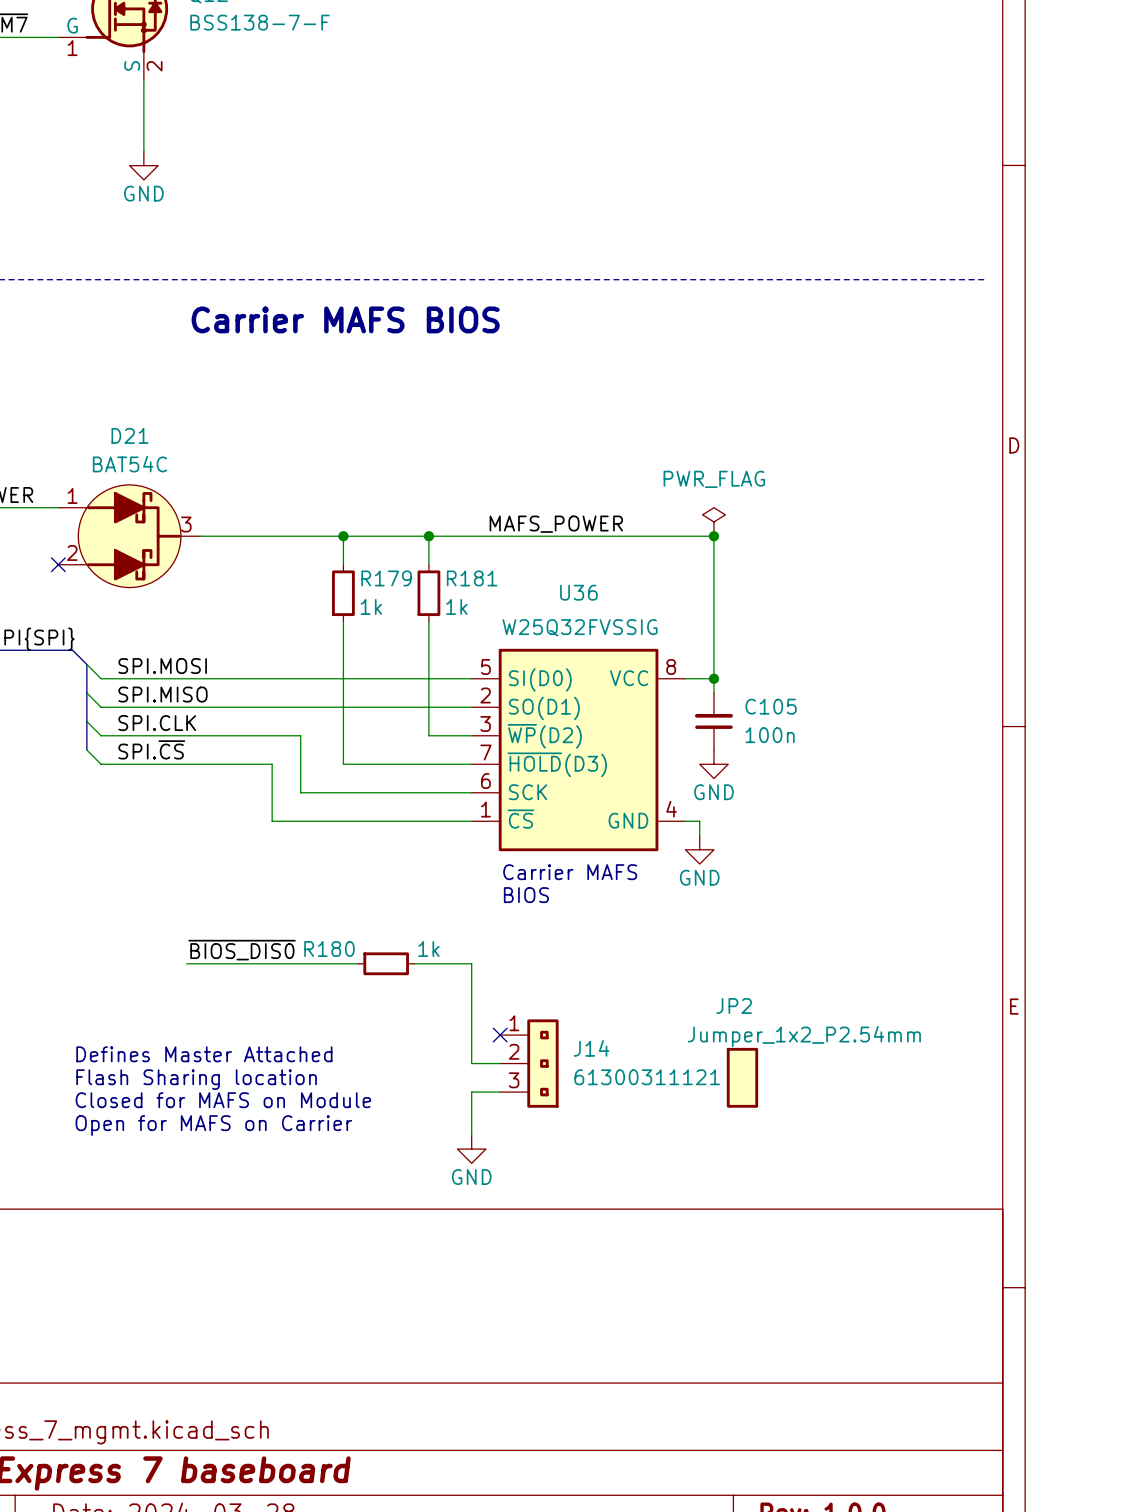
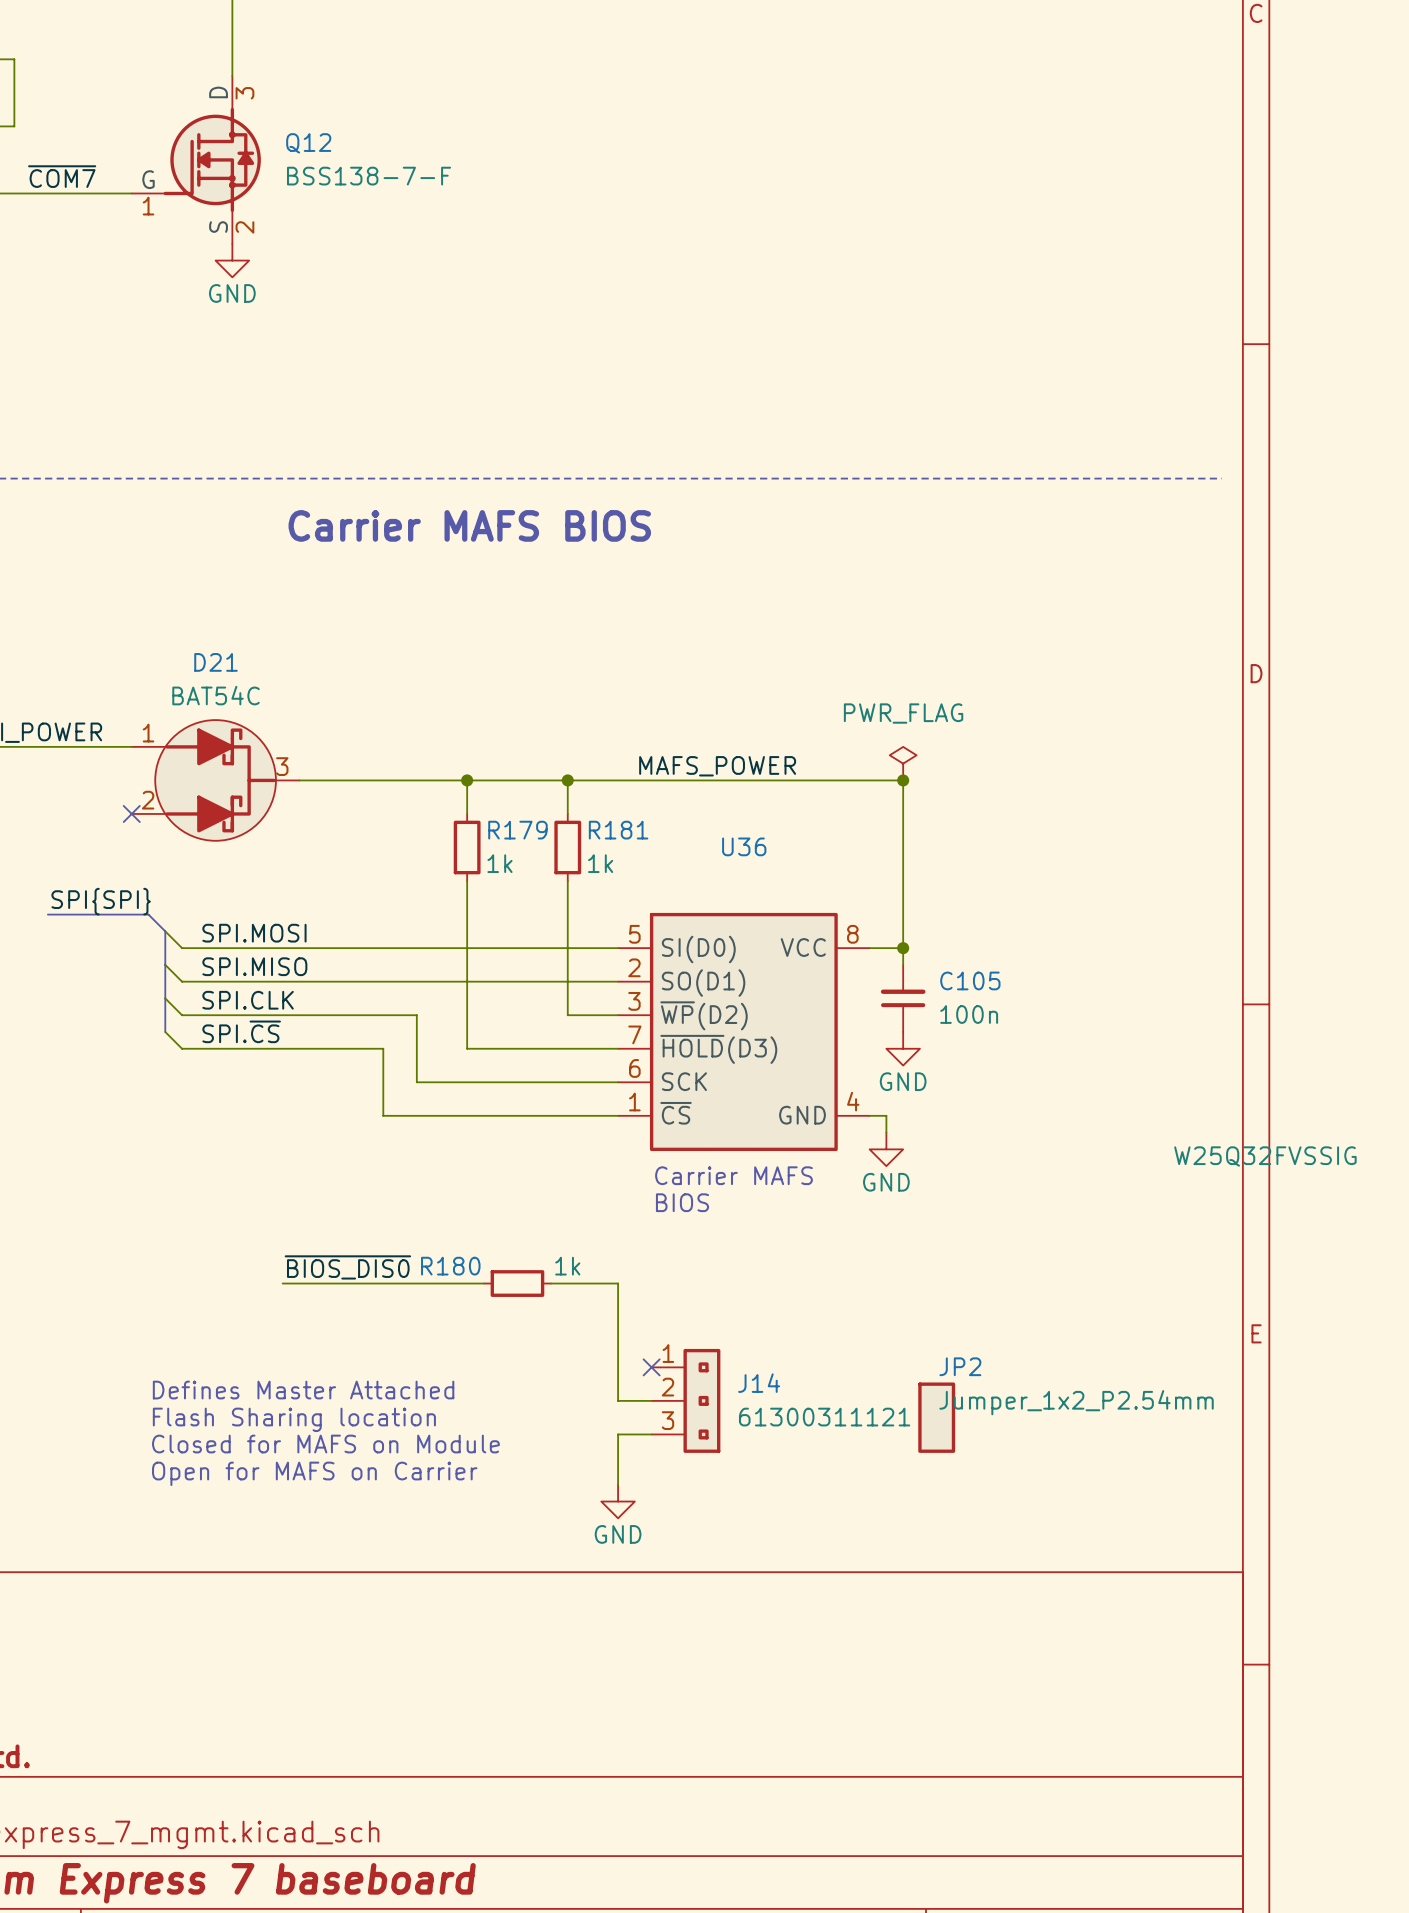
wire: (143, 80) (143, 151) -> none
power symbol position: GND (143, 165) -> GND (232, 260)
U36 text position: W25Q32FVSSIG (580, 627) -> W25Q32FVSSIG (1265, 1156)
JP2 name position: JP2 (734, 1006) -> JP2 (960, 1366)
JP2 value position: Jumper_1x2_P2.54mm (804, 1036) -> Jumper_1x2_P2.54mm (1076, 1402)

